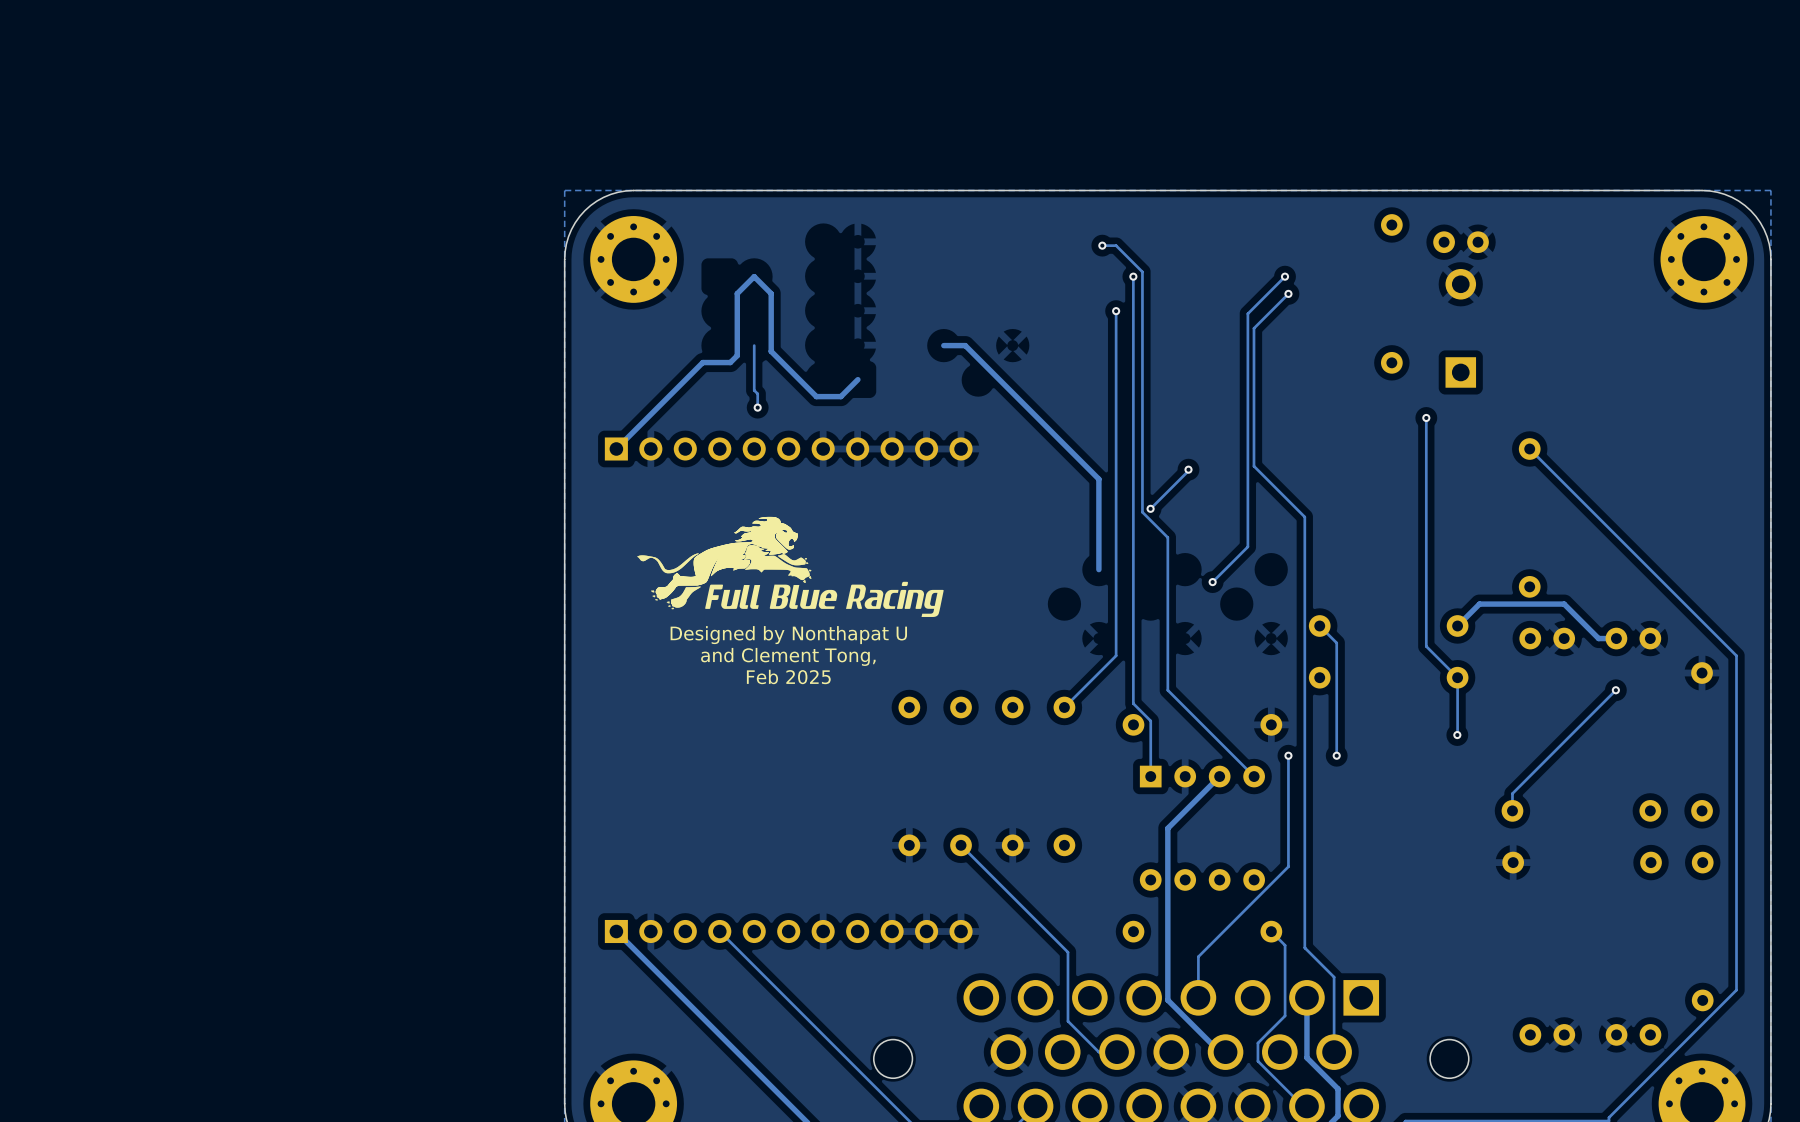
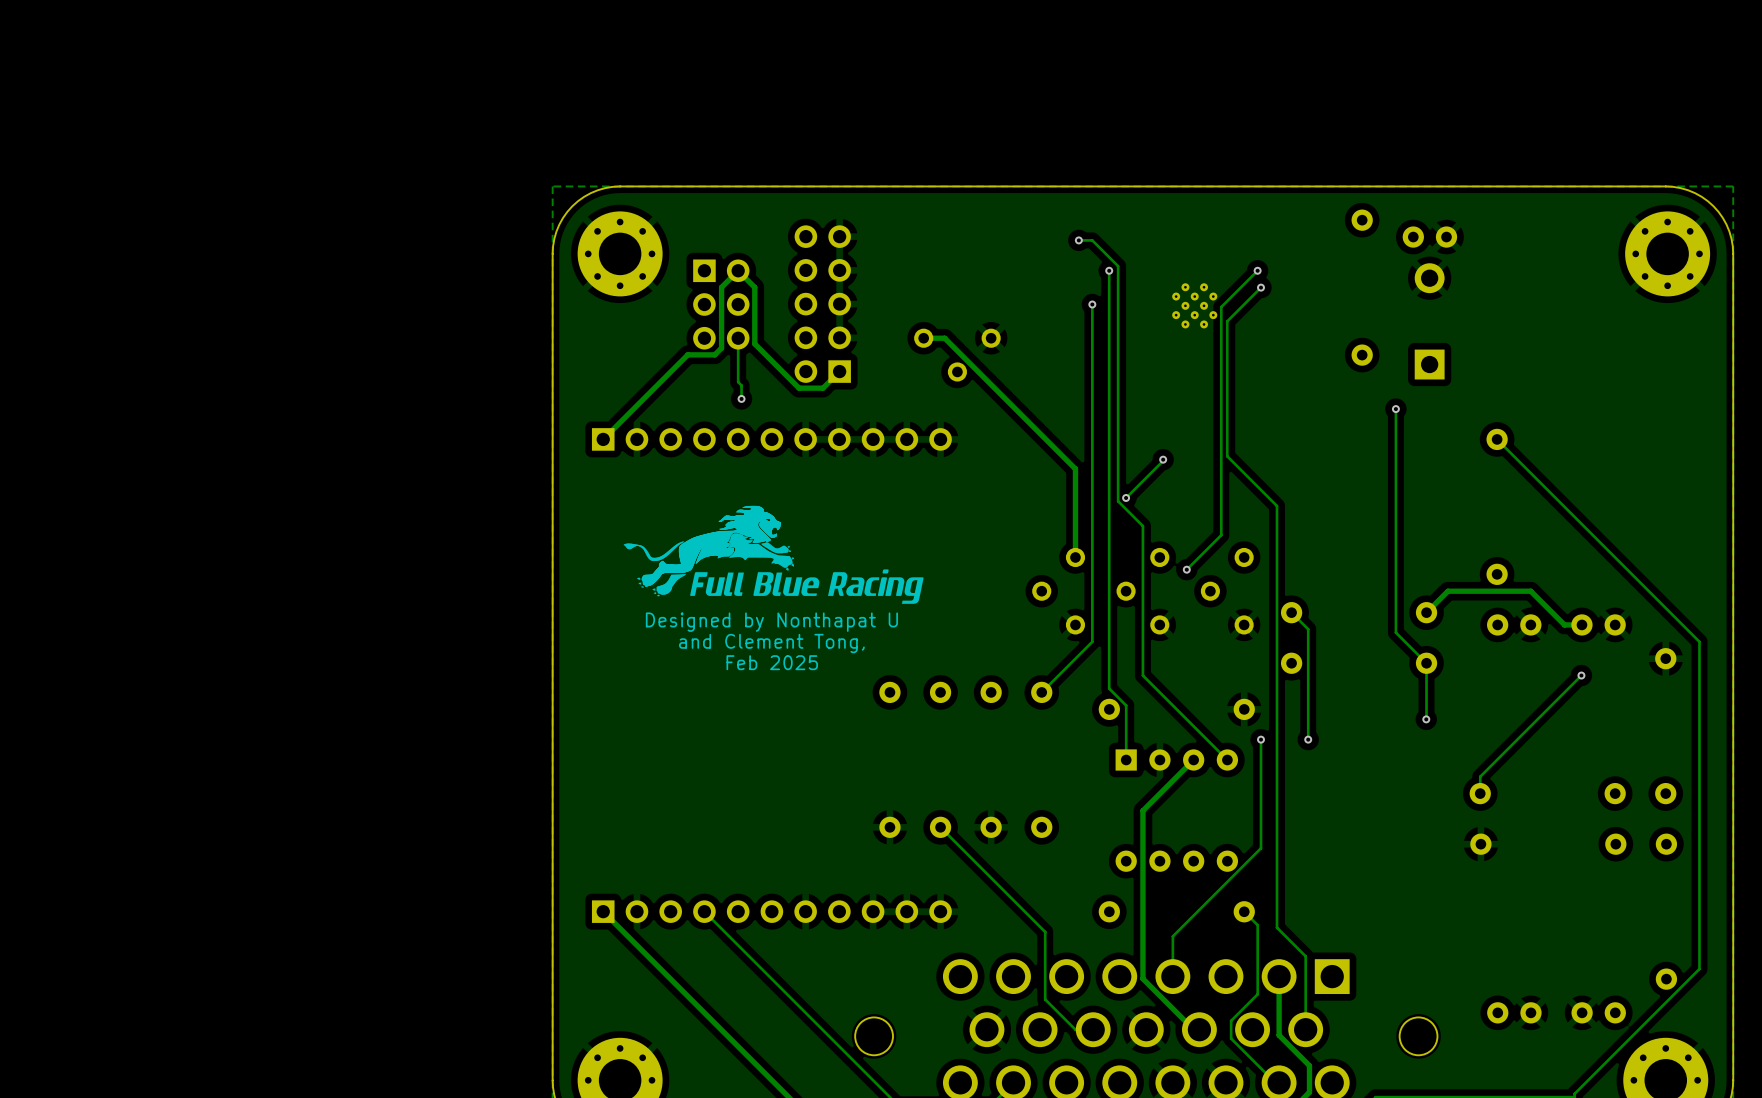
part: none -> (822, 304)
part: none -> (721, 304)
part: none -> (1194, 305)
part: none -> (957, 355)
part: none -> (1058, 591)
part: none -> (1142, 591)
part: none -> (1227, 591)

